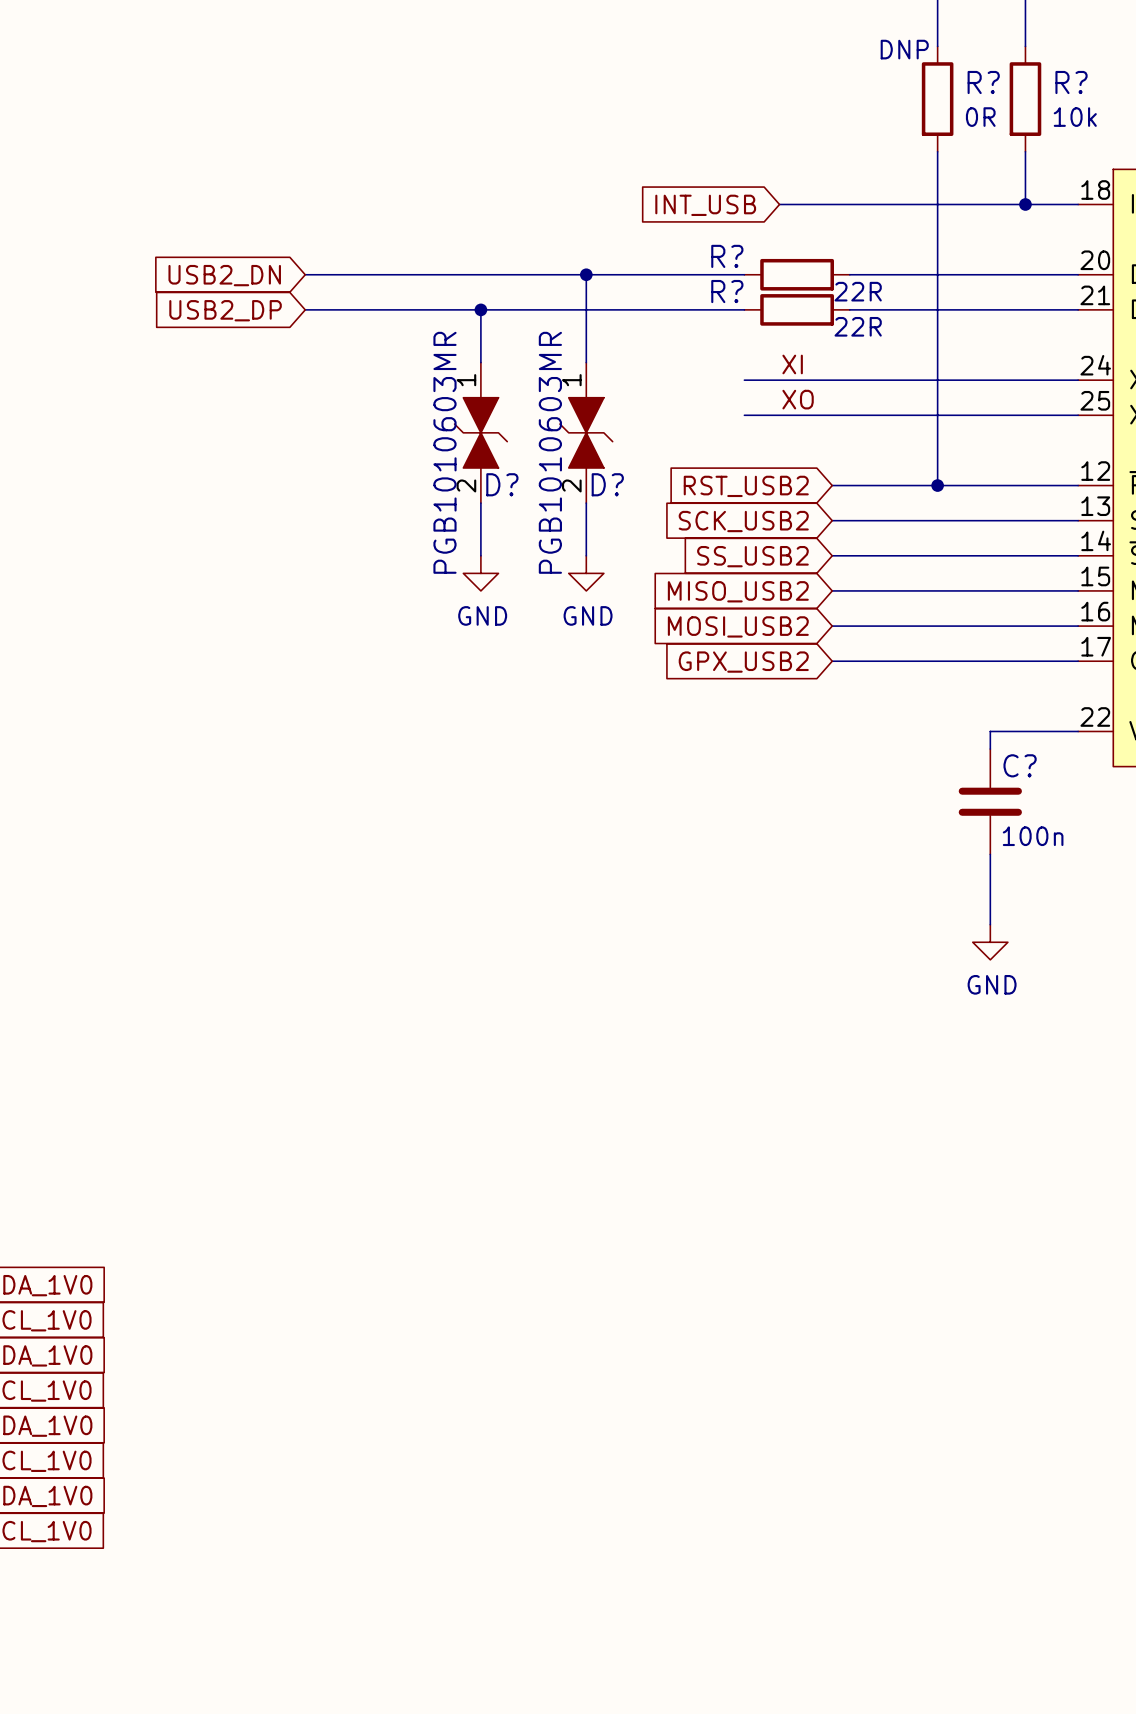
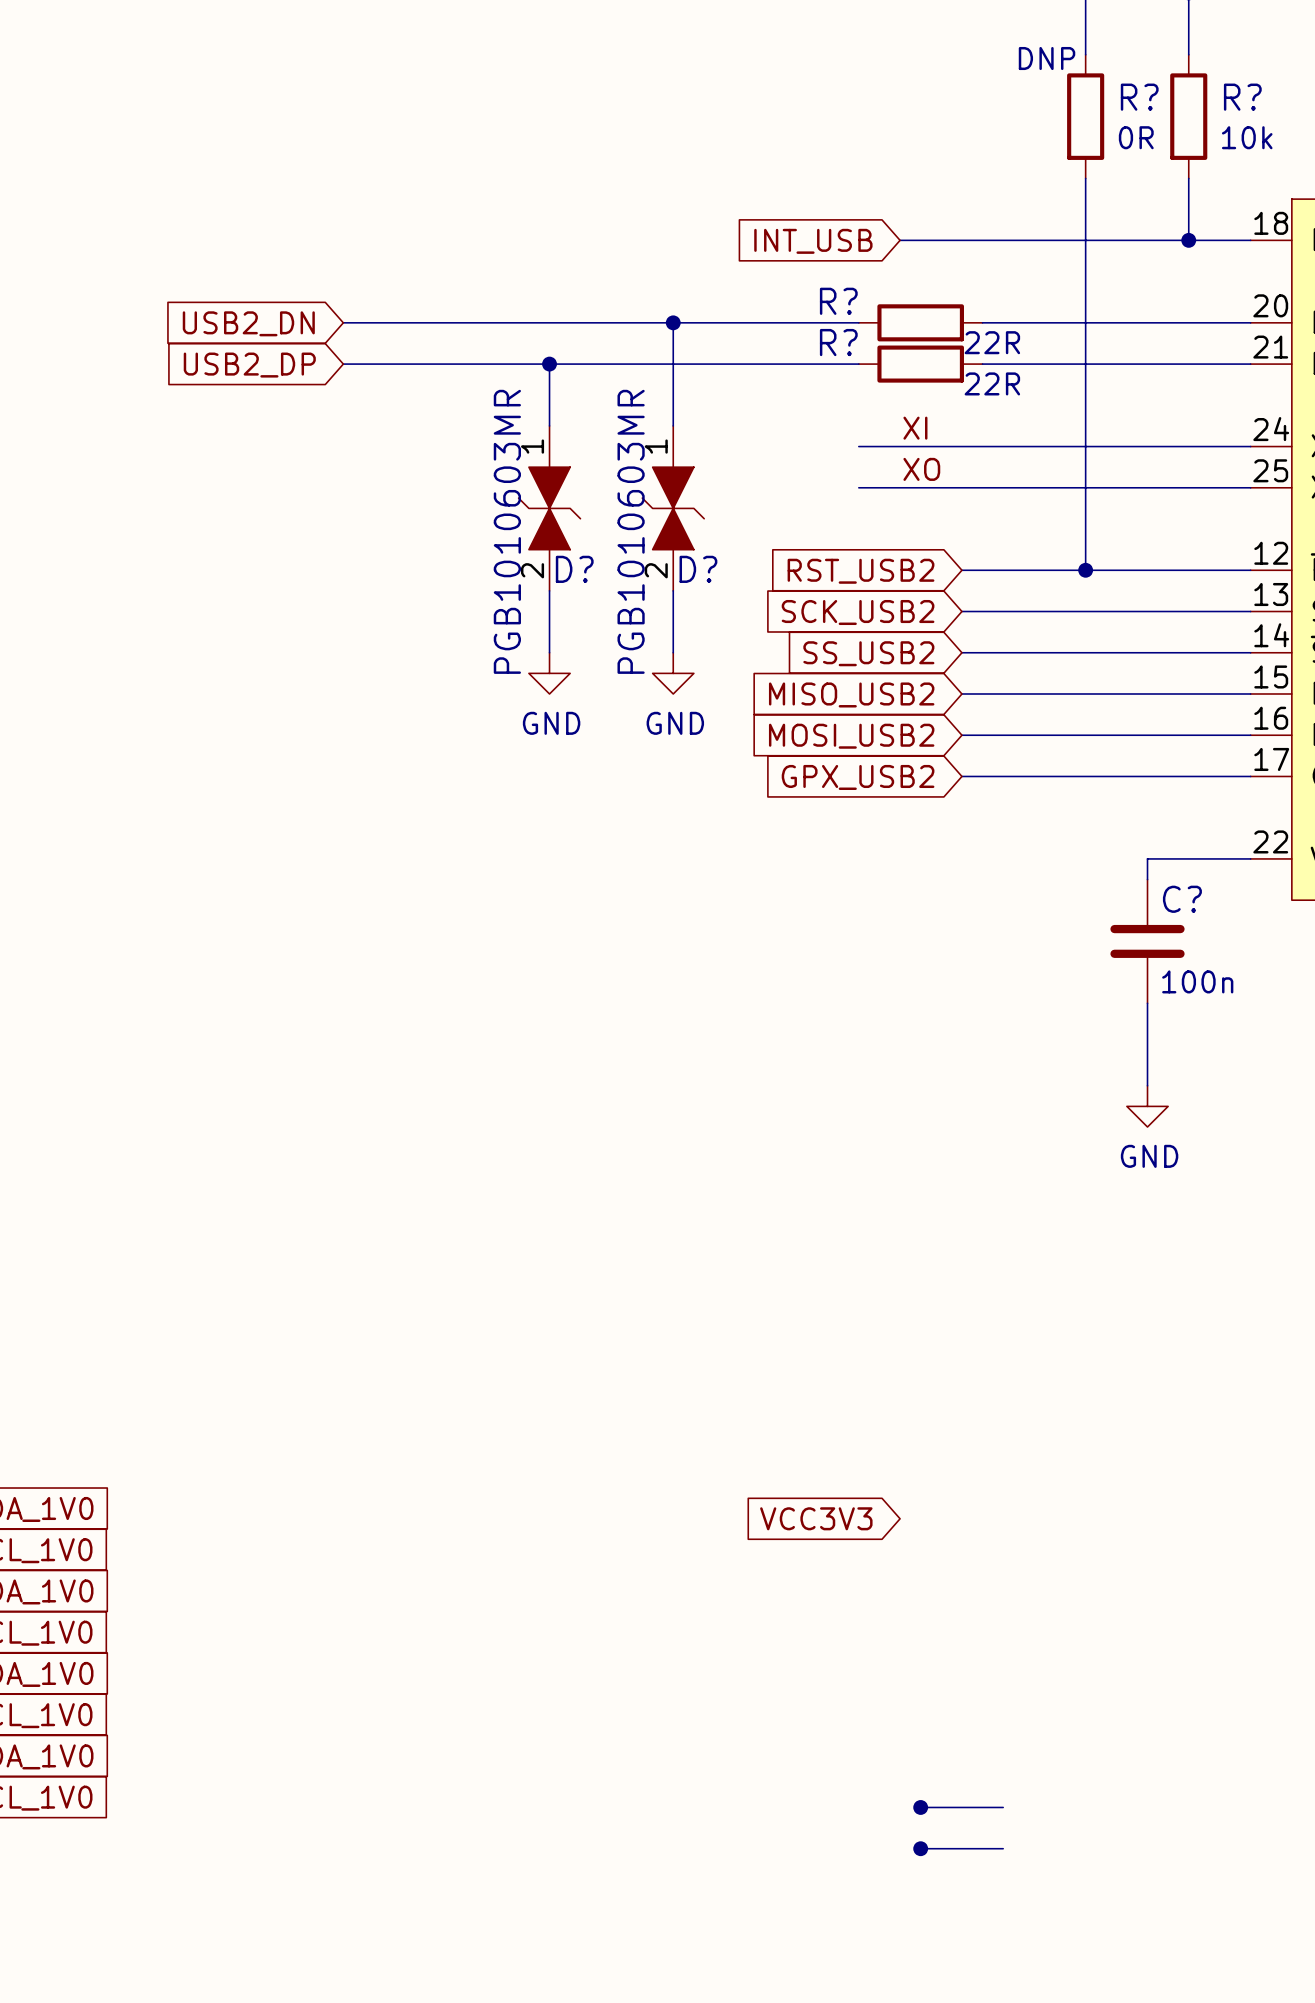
global label: none -> VCC3V3 (816, 1518)
wire: none -> (920, 1807) (1003, 1807)
junction: none -> (920, 1807)
wire: none -> (920, 1848) (1003, 1848)
junction: none -> (920, 1848)

